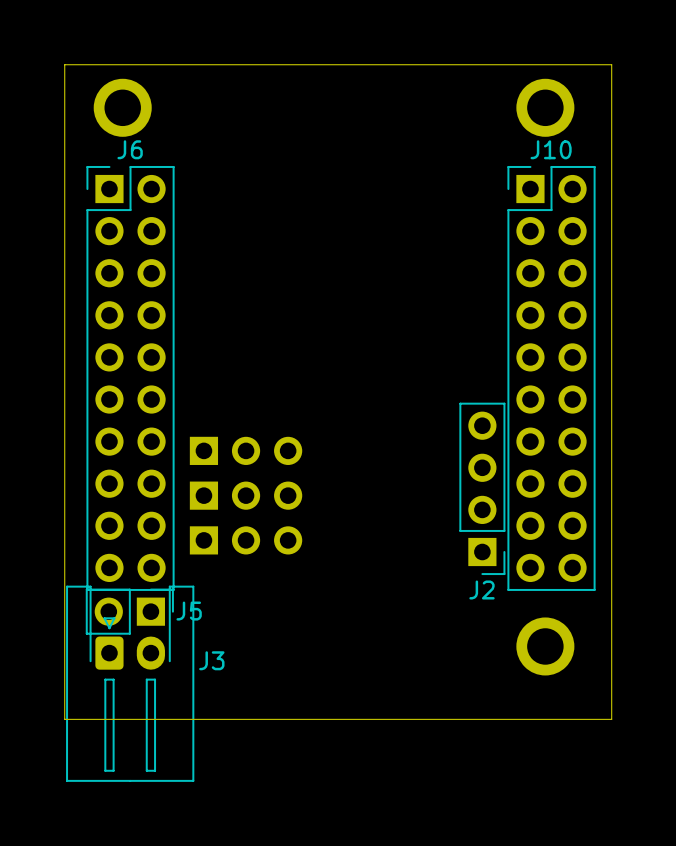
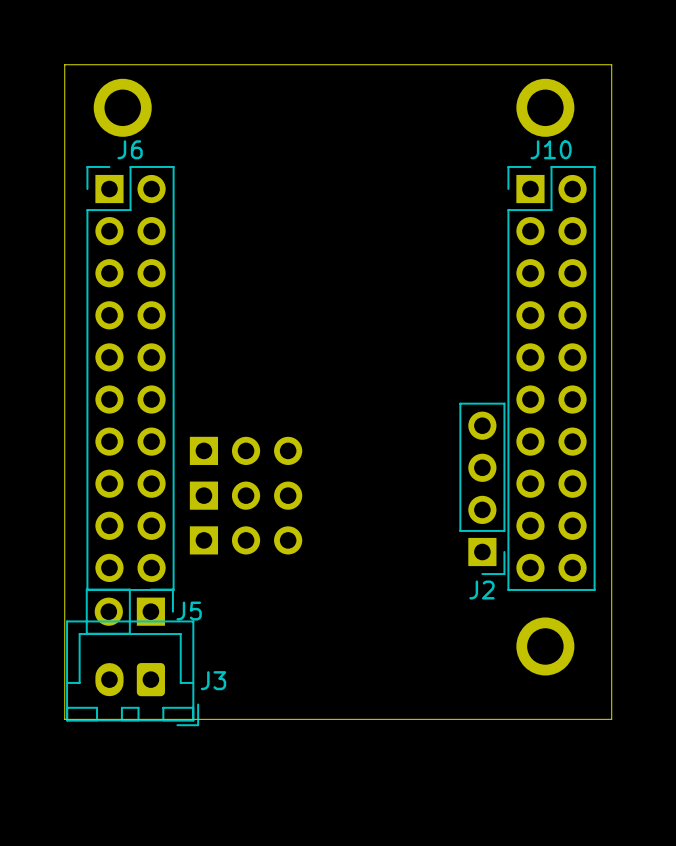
J3 footprint: [66, 585, 195, 782] -> [66, 620, 200, 727]

